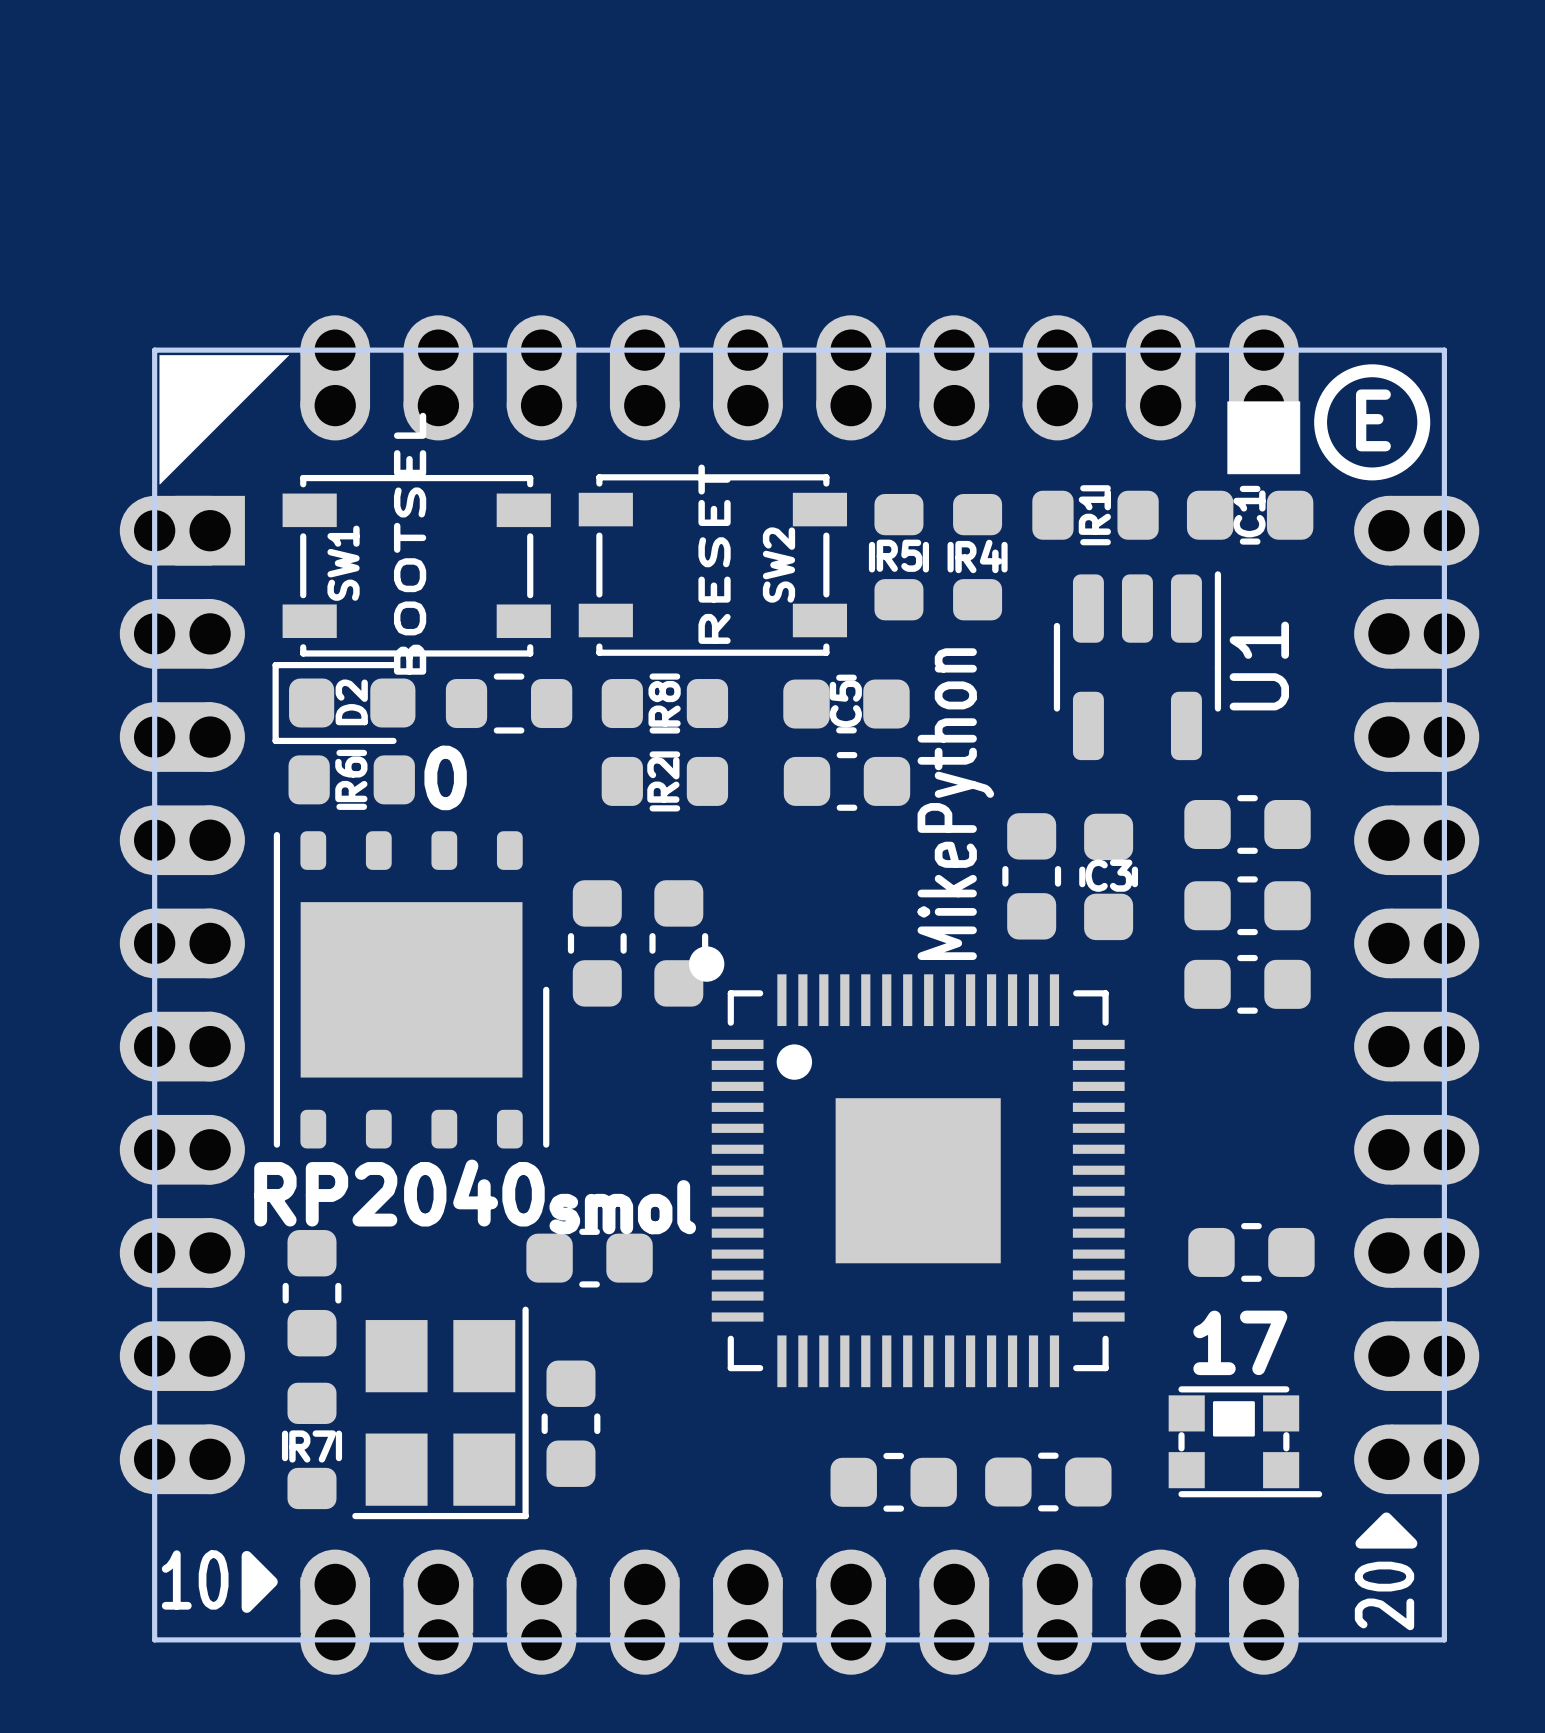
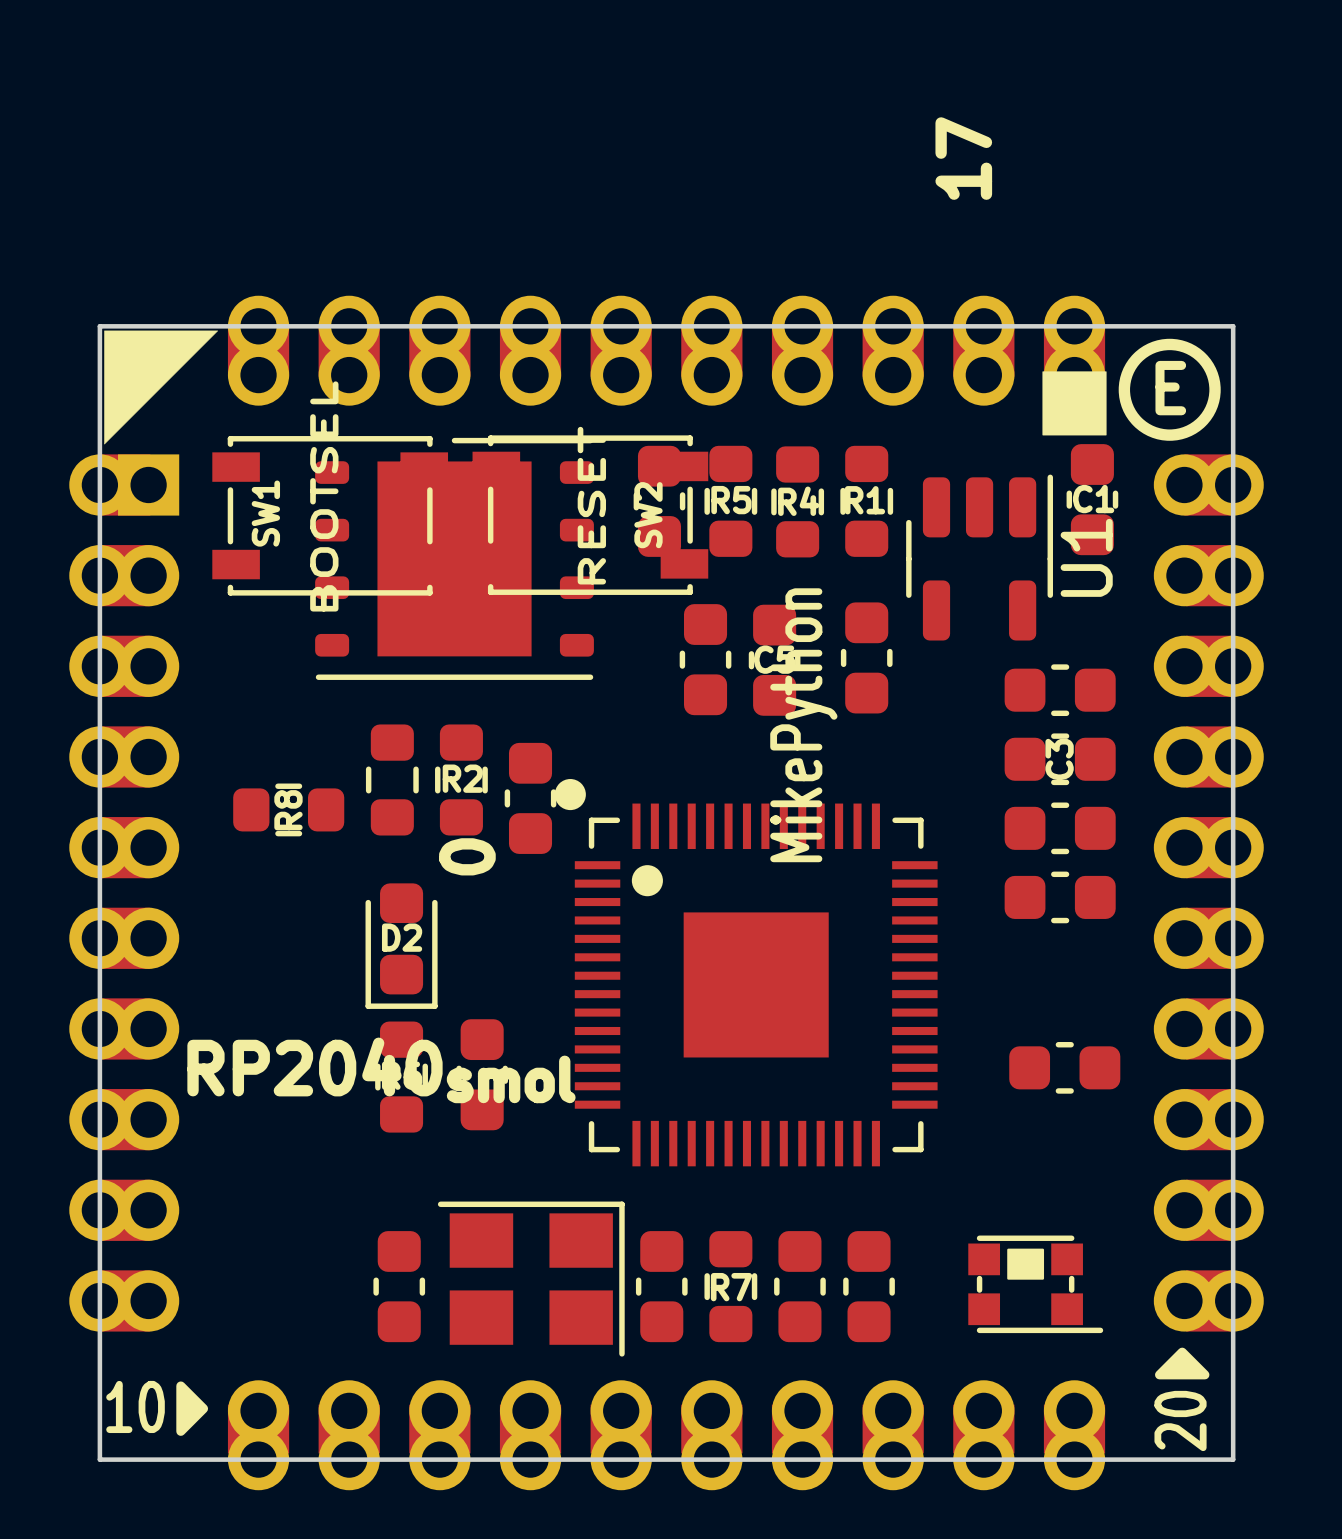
R1 rotation: 0° (1095, 515) -> 90° clockwise (866, 501)
R1 position: (1095, 515) -> (866, 501)
C1 rotation: 0° (1250, 515) -> 90° clockwise (1092, 499)
part: none -> (659, 501)
R5 position: (898, 557) -> (730, 501)
R4 position: (977, 557) -> (797, 501)
U1 position: (1137, 665) -> (979, 557)
D2 rotation: 0° (343, 703) -> 90° counterclockwise (401, 946)
D2 position: (343, 703) -> (401, 946)
part rotation: 0° (509, 703) -> 90° clockwise (392, 779)
part position: (509, 703) -> (392, 779)
R8 position: (664, 703) -> (288, 809)
C5 rotation: 0° (846, 704) -> 90° clockwise (774, 660)
C5 position: (846, 704) -> (774, 660)
part: none -> (866, 657)
R6 rotation: 0° (351, 779) -> 90° clockwise (401, 1077)
R6 position: (351, 779) -> (401, 1077)
R2 rotation: 0° (664, 781) -> 90° clockwise (461, 779)
R2 position: (664, 781) -> (461, 779)
part rotation: 0° (846, 781) -> 90° clockwise (705, 659)
part position: (1247, 824) -> (1060, 690)
part: (1031, 876) -> none
C3 rotation: 0° (1108, 876) -> 90° clockwise (1060, 759)
C3 position: (1108, 876) -> (1060, 759)
part: none -> (530, 798)
part position: (1247, 905) -> (1060, 828)
part: (597, 943) -> none
part: (678, 943) -> none
part position: (1247, 984) -> (1060, 897)
part rotation: 0° (411, 989) -> 90° counterclockwise (454, 558)
part position: (411, 989) -> (454, 558)
part position: (906, 1166) -> (746, 972)
part position: (1251, 1252) -> (1064, 1067)
part rotation: 0° (589, 1258) -> 90° clockwise (482, 1074)
part: (312, 1293) -> none
part rotation: 0° (440, 1412) -> 90° counterclockwise (531, 1279)
part position: (440, 1412) -> (531, 1279)
part position: (570, 1423) -> (399, 1286)
part position: (1245, 1441) -> (1035, 1284)
part: none -> (661, 1286)
part: none -> (799, 1286)
R7 position: (312, 1445) -> (730, 1286)
part: (893, 1482) -> none
part rotation: 0° (1048, 1482) -> 90° clockwise (869, 1286)

